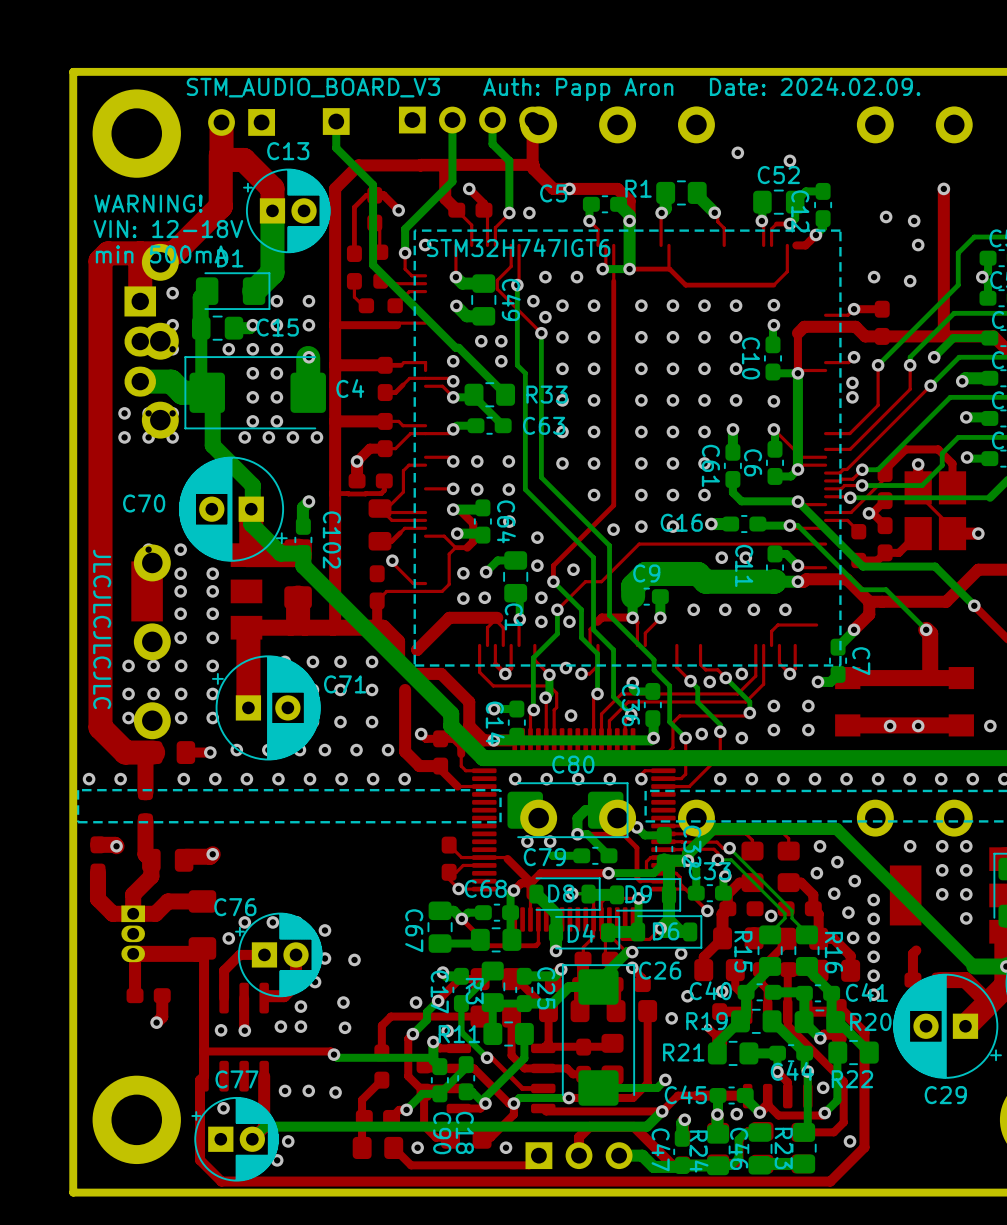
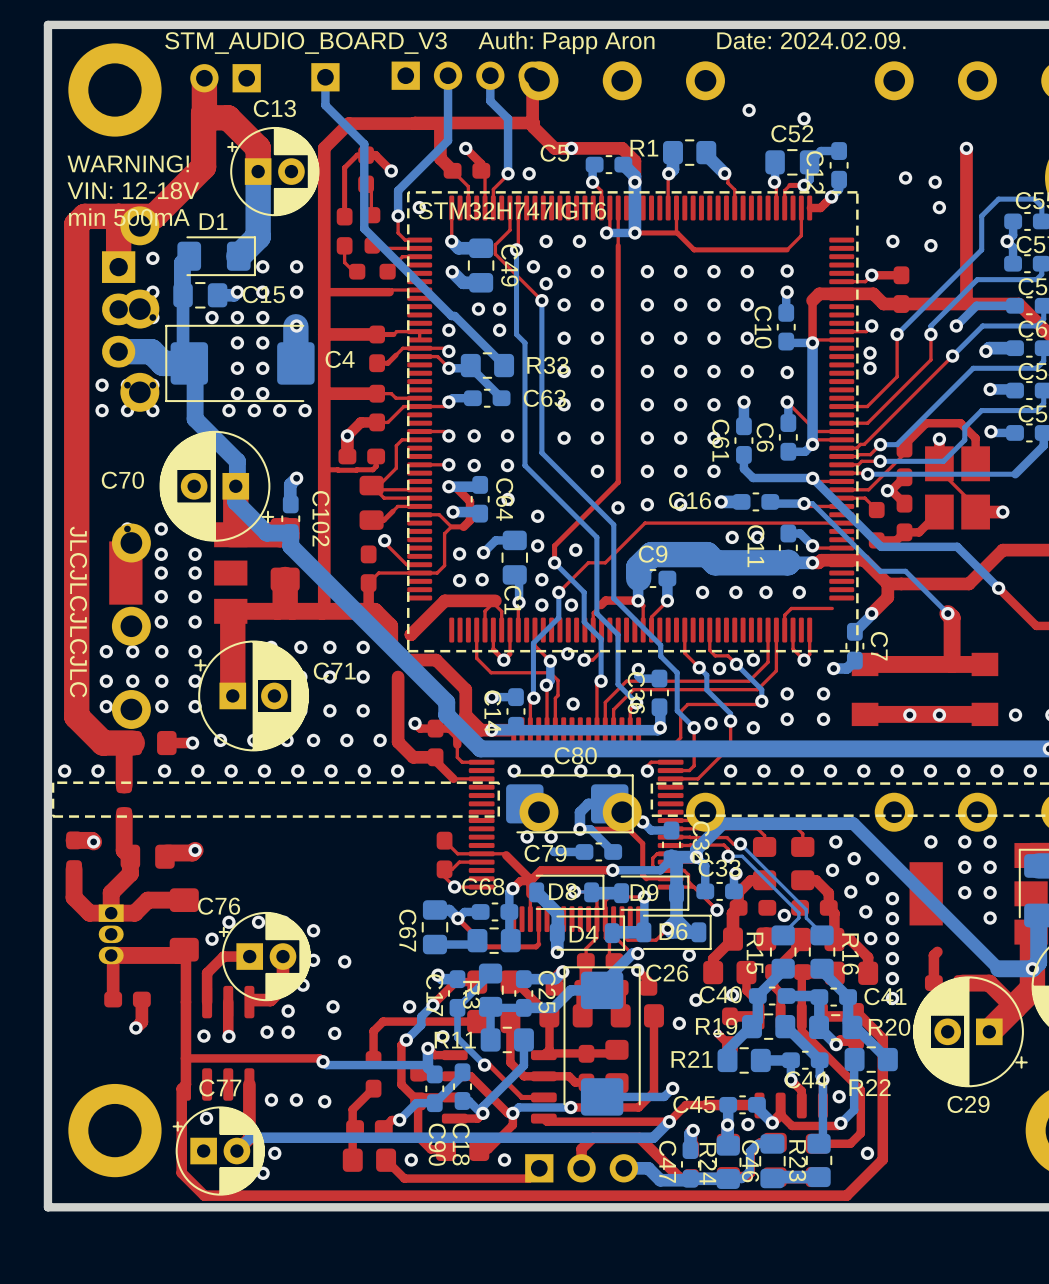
part: none -> (630, 419)

